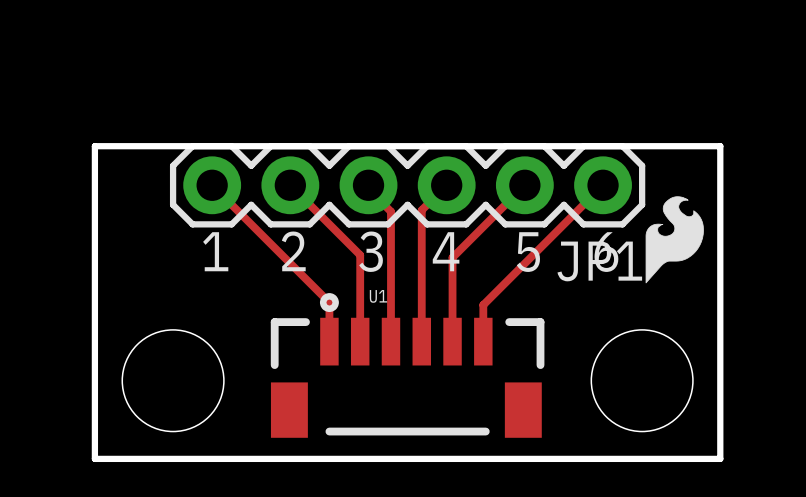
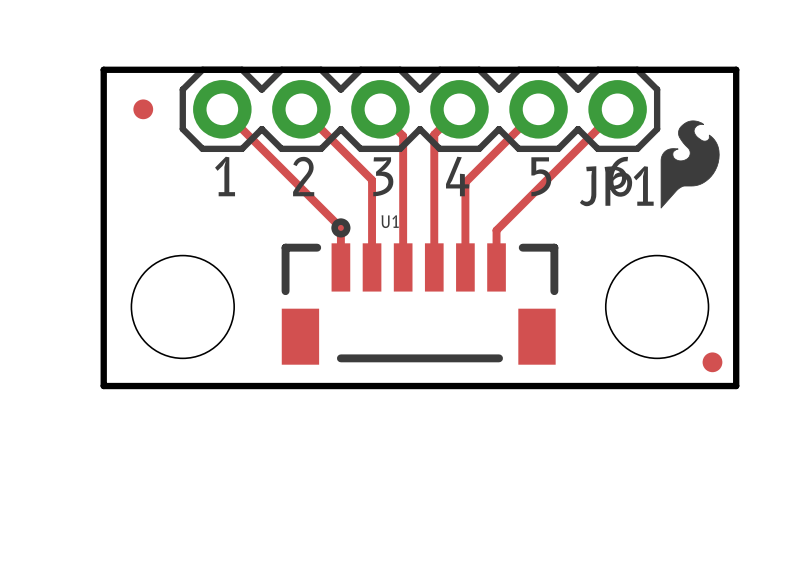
part: none -> (143, 109)
part: none -> (712, 362)

